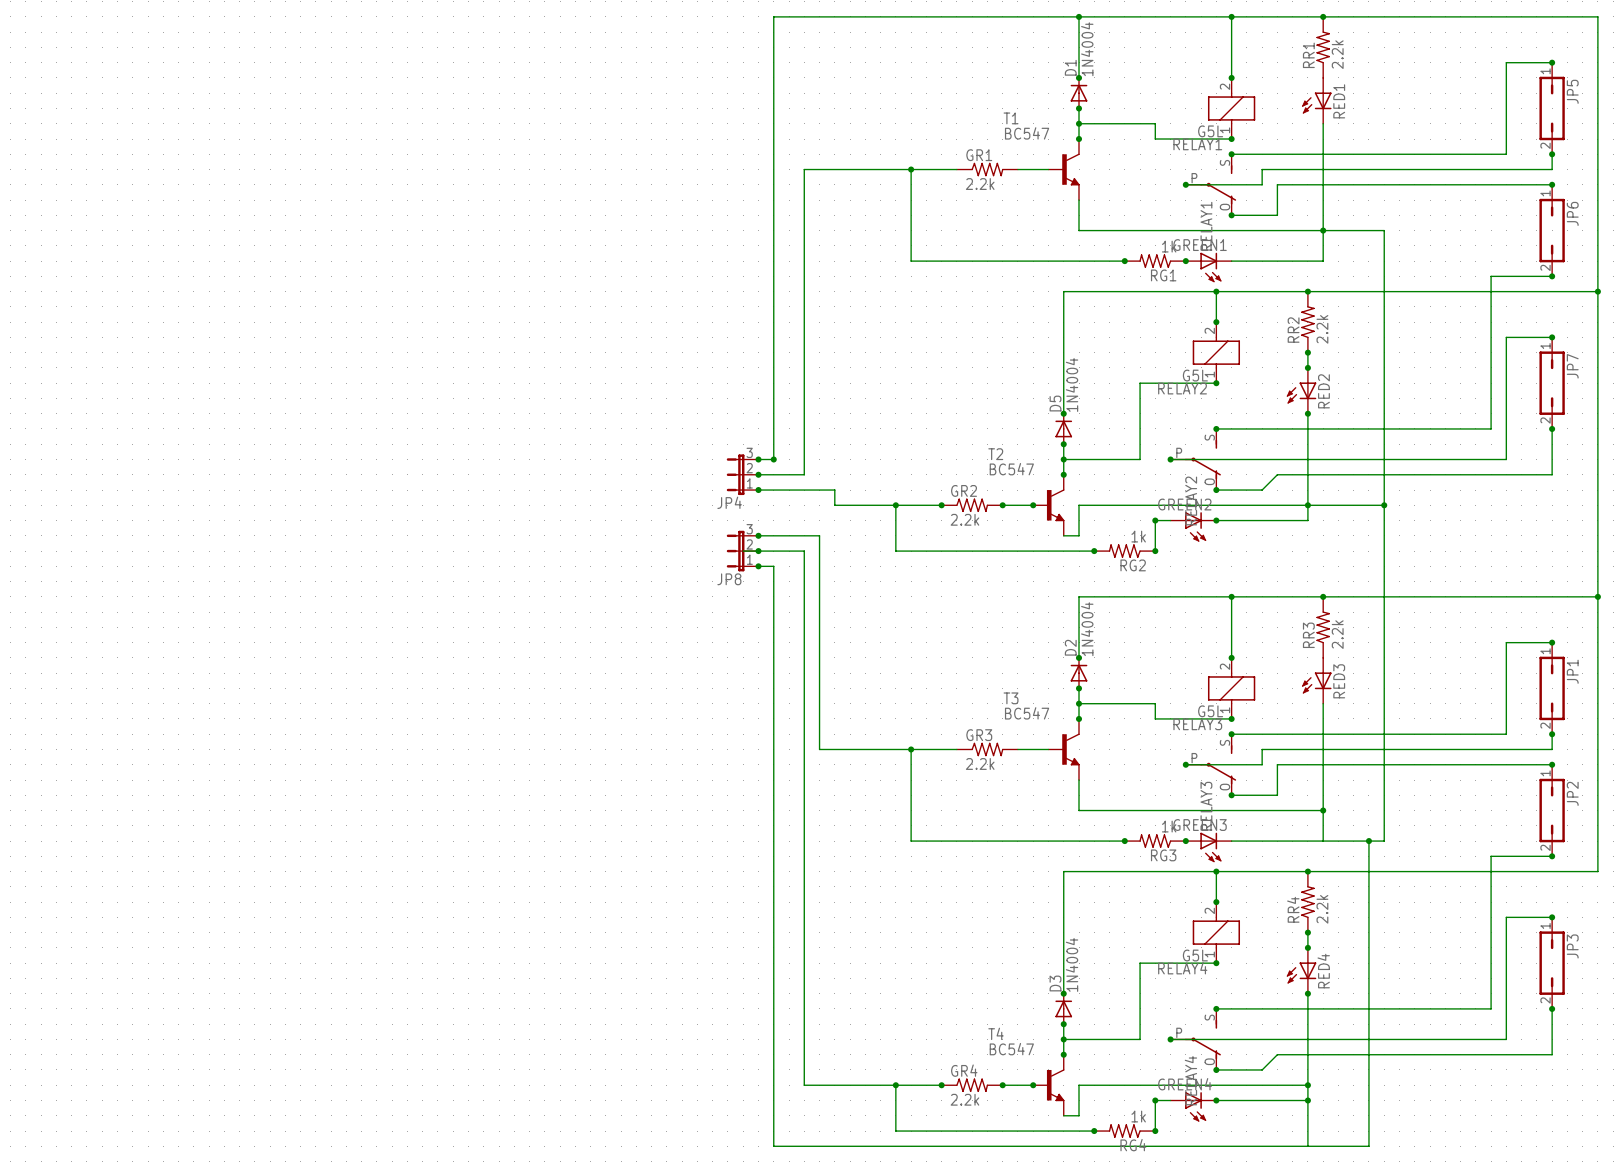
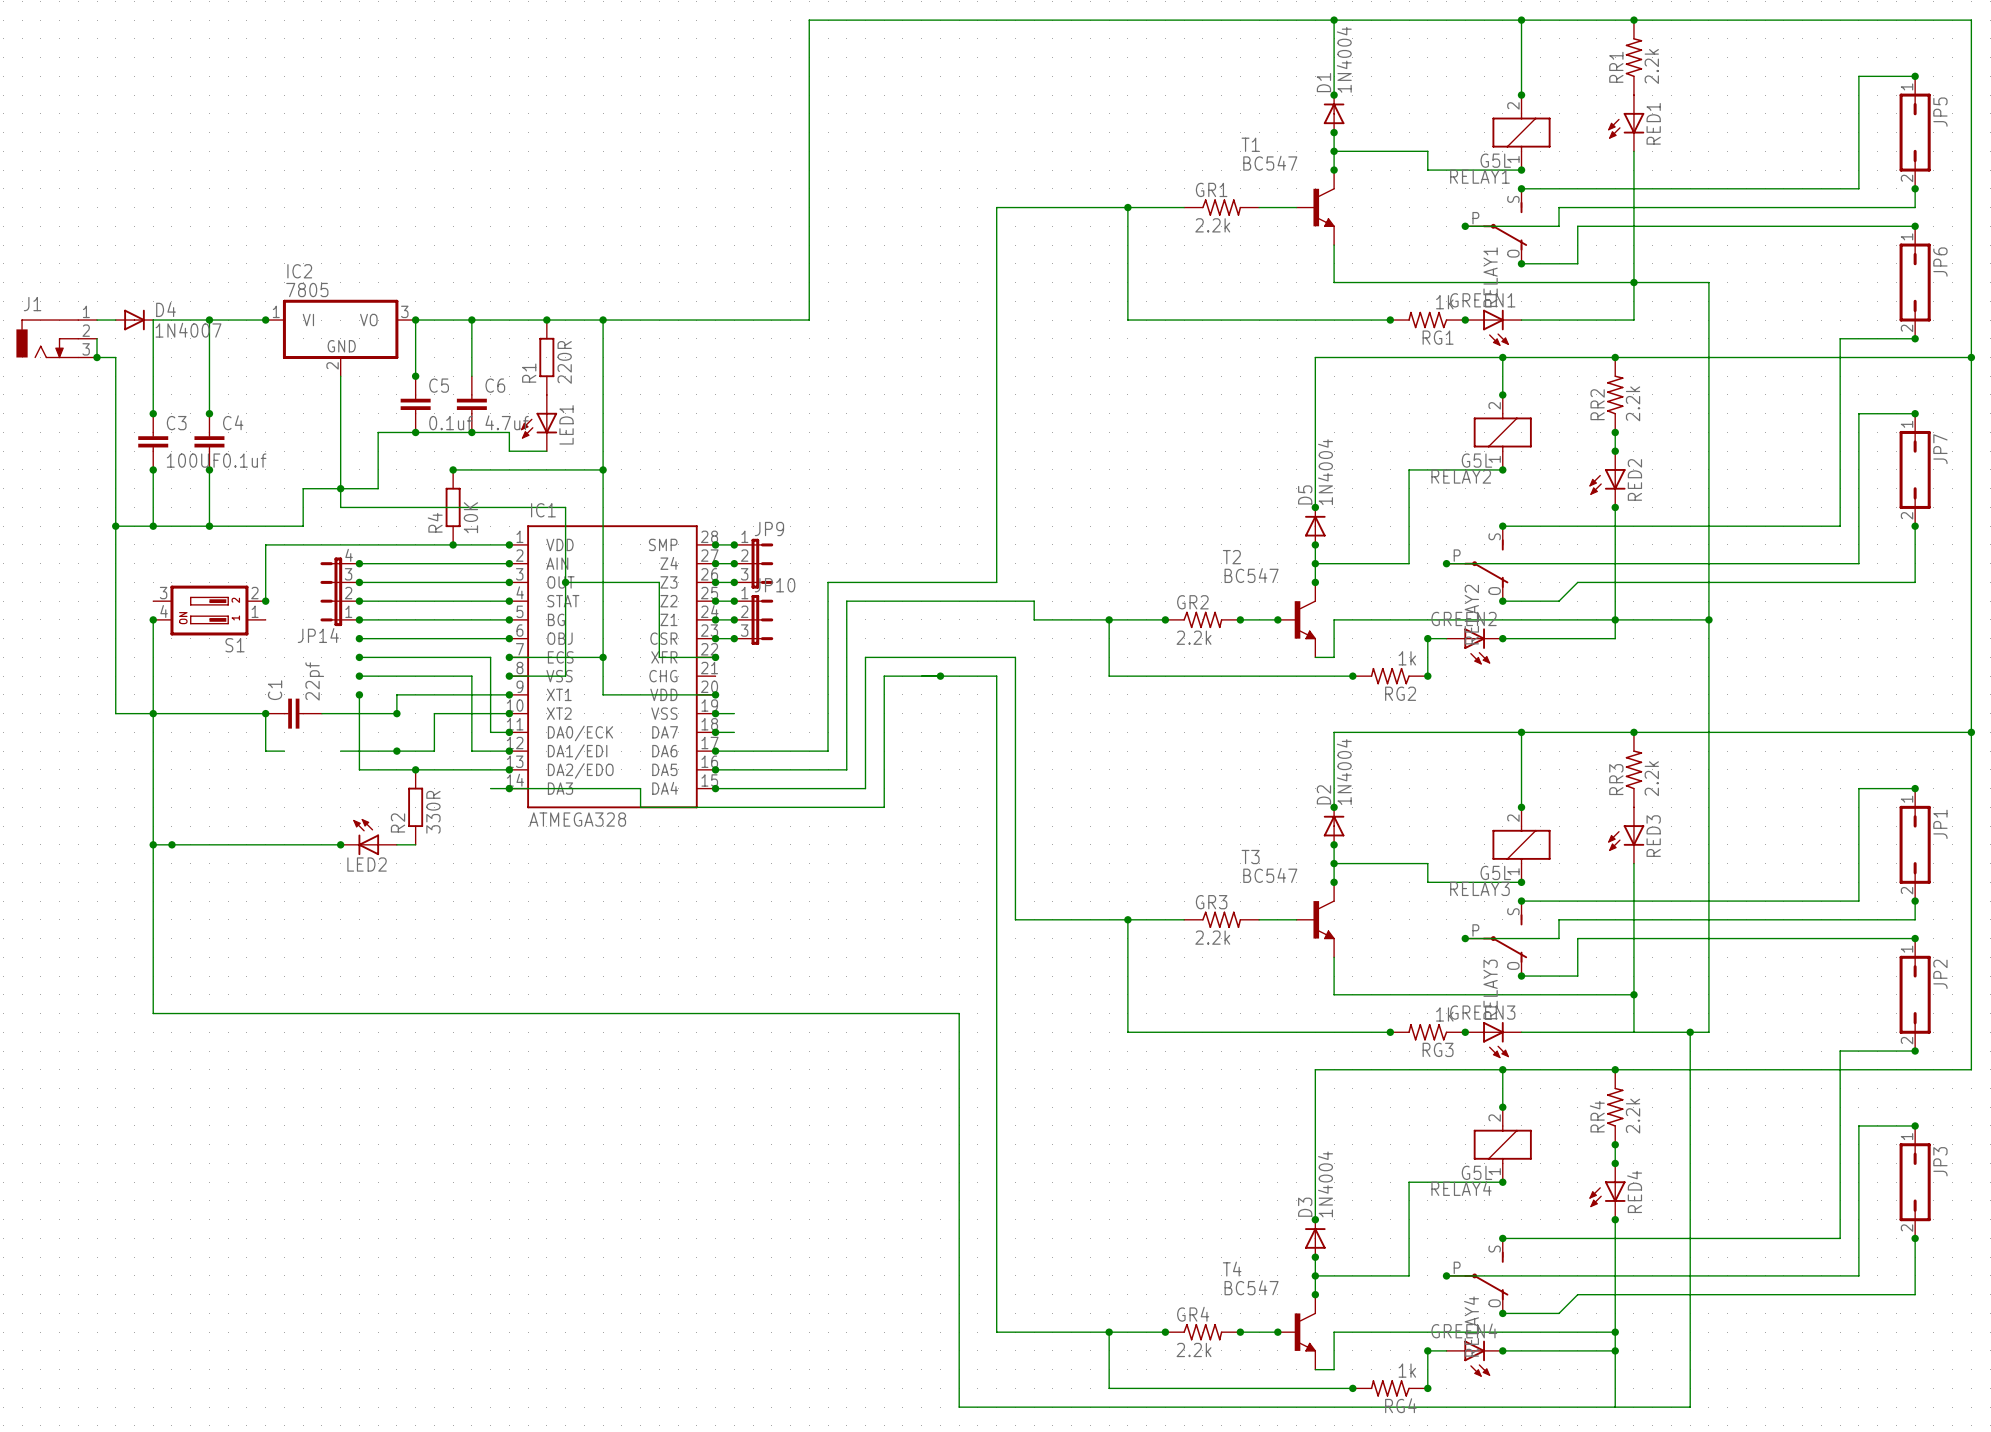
wire: (773, 16) (773, 459) (758, 459) -> (959, 20) (809, 20) (809, 320) (415, 320) (415, 376)
wire: none -> (97, 320) (115, 320)
D4: none -> 1N4007 (134, 320)
wire: none -> (209, 320) (209, 413)
junction: none -> (209, 320)
wire: none -> (265, 320) (153, 320) (153, 413)
junction: none -> (265, 320)
junction: none -> (415, 320)
wire: none -> (471, 320) (471, 376)
junction: none -> (471, 320)
junction: none -> (546, 320)
wire: none -> (603, 320) (603, 694) (715, 694)
junction: none -> (603, 320)
IC2: none -> 7805 (340, 338)
J1: none -> (56, 338)
wire: none -> (97, 338) (97, 357) (115, 357) (115, 713) (265, 713) (265, 751) (284, 751)
junction: none -> (97, 357)
R1: none -> 220R (546, 357)
wire: none -> (340, 376) (340, 507) (565, 507) (565, 676) (509, 676)
junction: none -> (415, 376)
C5: none -> 0.1uf (415, 404)
C6: none -> 4.7uf (471, 404)
junction: none -> (153, 413)
junction: none -> (209, 413)
LED1: none -> (539, 423)
junction: none -> (415, 432)
junction: none -> (471, 432)
C3: none -> 100UF (153, 441)
C4: none -> 0.1uf (209, 441)
wire: none -> (546, 451) (509, 451) (509, 432) (378, 432) (378, 488) (303, 488) (303, 526) (115, 526)
wire: none -> (153, 469) (153, 526)
junction: none -> (153, 469)
wire: none -> (209, 469) (209, 526)
junction: none -> (209, 469)
wire: none -> (453, 469) (603, 469)
junction: none -> (453, 469)
junction: none -> (603, 469)
junction: none -> (340, 488)
R4: none -> 10K (453, 507)
junction: none -> (115, 526)
junction: none -> (153, 526)
junction: none -> (209, 526)
junction: none -> (453, 544)
wire: none -> (509, 544) (265, 544) (265, 601)
junction: none -> (509, 544)
wire: none -> (715, 544) (734, 544)
junction: none -> (715, 544)
junction: none -> (734, 544)
wire: none -> (359, 563) (509, 563)
junction: none -> (359, 563)
junction: none -> (509, 563)
wire: none -> (715, 563) (734, 563)
junction: none -> (715, 563)
junction: none -> (734, 563)
JP9: none -> (753, 563)
junction: (758, 459) -> none
junction: (773, 459) -> none
wire: none -> (359, 582) (509, 582)
junction: none -> (359, 582)
junction: none -> (509, 582)
wire: none -> (565, 582) (659, 582) (659, 657) (715, 657)
junction: none -> (565, 582)
wire: none -> (715, 582) (734, 582)
junction: none -> (715, 582)
junction: none -> (734, 582)
JP4: (742, 474) -> none
wire: none -> (940, 582) (828, 582) (828, 751) (715, 751)
junction: (758, 474) -> none
JP14: none -> (339, 591)
junction: none -> (265, 601)
wire: none -> (359, 601) (509, 601)
junction: none -> (359, 601)
junction: none -> (509, 601)
wire: none -> (715, 601) (734, 601)
junction: none -> (715, 601)
junction: none -> (734, 601)
wire: none -> (940, 601) (846, 601) (846, 769) (715, 769)
junction: (758, 490) -> none
S1: none -> (209, 610)
junction: none -> (153, 619)
wire: none -> (359, 619) (509, 619)
junction: none -> (359, 619)
junction: none -> (509, 619)
wire: none -> (715, 619) (734, 619)
junction: none -> (715, 619)
junction: none -> (734, 619)
JP10: none -> (753, 619)
wire: none -> (359, 638) (509, 638)
junction: none -> (359, 638)
junction: none -> (509, 638)
wire: none -> (715, 638) (734, 638)
junction: none -> (715, 638)
junction: none -> (734, 638)
wire: none -> (359, 657) (490, 657) (490, 732) (509, 732)
junction: none -> (359, 657)
wire: none -> (509, 657) (603, 657)
junction: none -> (509, 657)
junction: none -> (603, 657)
junction: none -> (715, 657)
wire: none -> (940, 657) (865, 657) (865, 788) (715, 788)
junction: (758, 535) -> none
IC1: none -> ATMEGA328 (612, 666)
wire: none -> (359, 676) (471, 676) (471, 751) (509, 751)
junction: none -> (359, 676)
junction: none -> (509, 676)
JP8: (742, 551) -> none
wire: none -> (921, 676) (884, 676) (884, 807) (640, 807) (640, 788) (490, 788)
wire: none -> (359, 694) (359, 769) (509, 769)
junction: none -> (359, 694)
wire: none -> (509, 694) (396, 694) (396, 713) (321, 713)
junction: none -> (509, 694)
junction: none -> (715, 694)
wire: (758, 566) (773, 566) (773, 825) -> (153, 619) (153, 1013) (959, 1013)
junction: (758, 566) -> none
junction: none -> (153, 713)
junction: none -> (265, 713)
C1: none -> 22pf (293, 713)
junction: none -> (396, 713)
wire: none -> (509, 713) (434, 713) (434, 751) (340, 751)
junction: none -> (509, 713)
wire: none -> (715, 713) (734, 713)
junction: none -> (715, 713)
junction: none -> (509, 732)
wire: none -> (715, 732) (734, 732)
junction: none -> (715, 732)
junction: none -> (396, 751)
junction: none -> (509, 751)
junction: none -> (715, 751)
junction: none -> (415, 769)
junction: none -> (509, 769)
junction: none -> (715, 769)
junction: none -> (509, 788)
junction: none -> (715, 788)
R2: none -> 330R (415, 807)
LED2: none -> (368, 837)
wire: none -> (153, 844) (340, 844)
junction: none -> (153, 844)
junction: none -> (171, 844)
junction: none -> (340, 844)
wire: none -> (396, 844) (415, 844)

